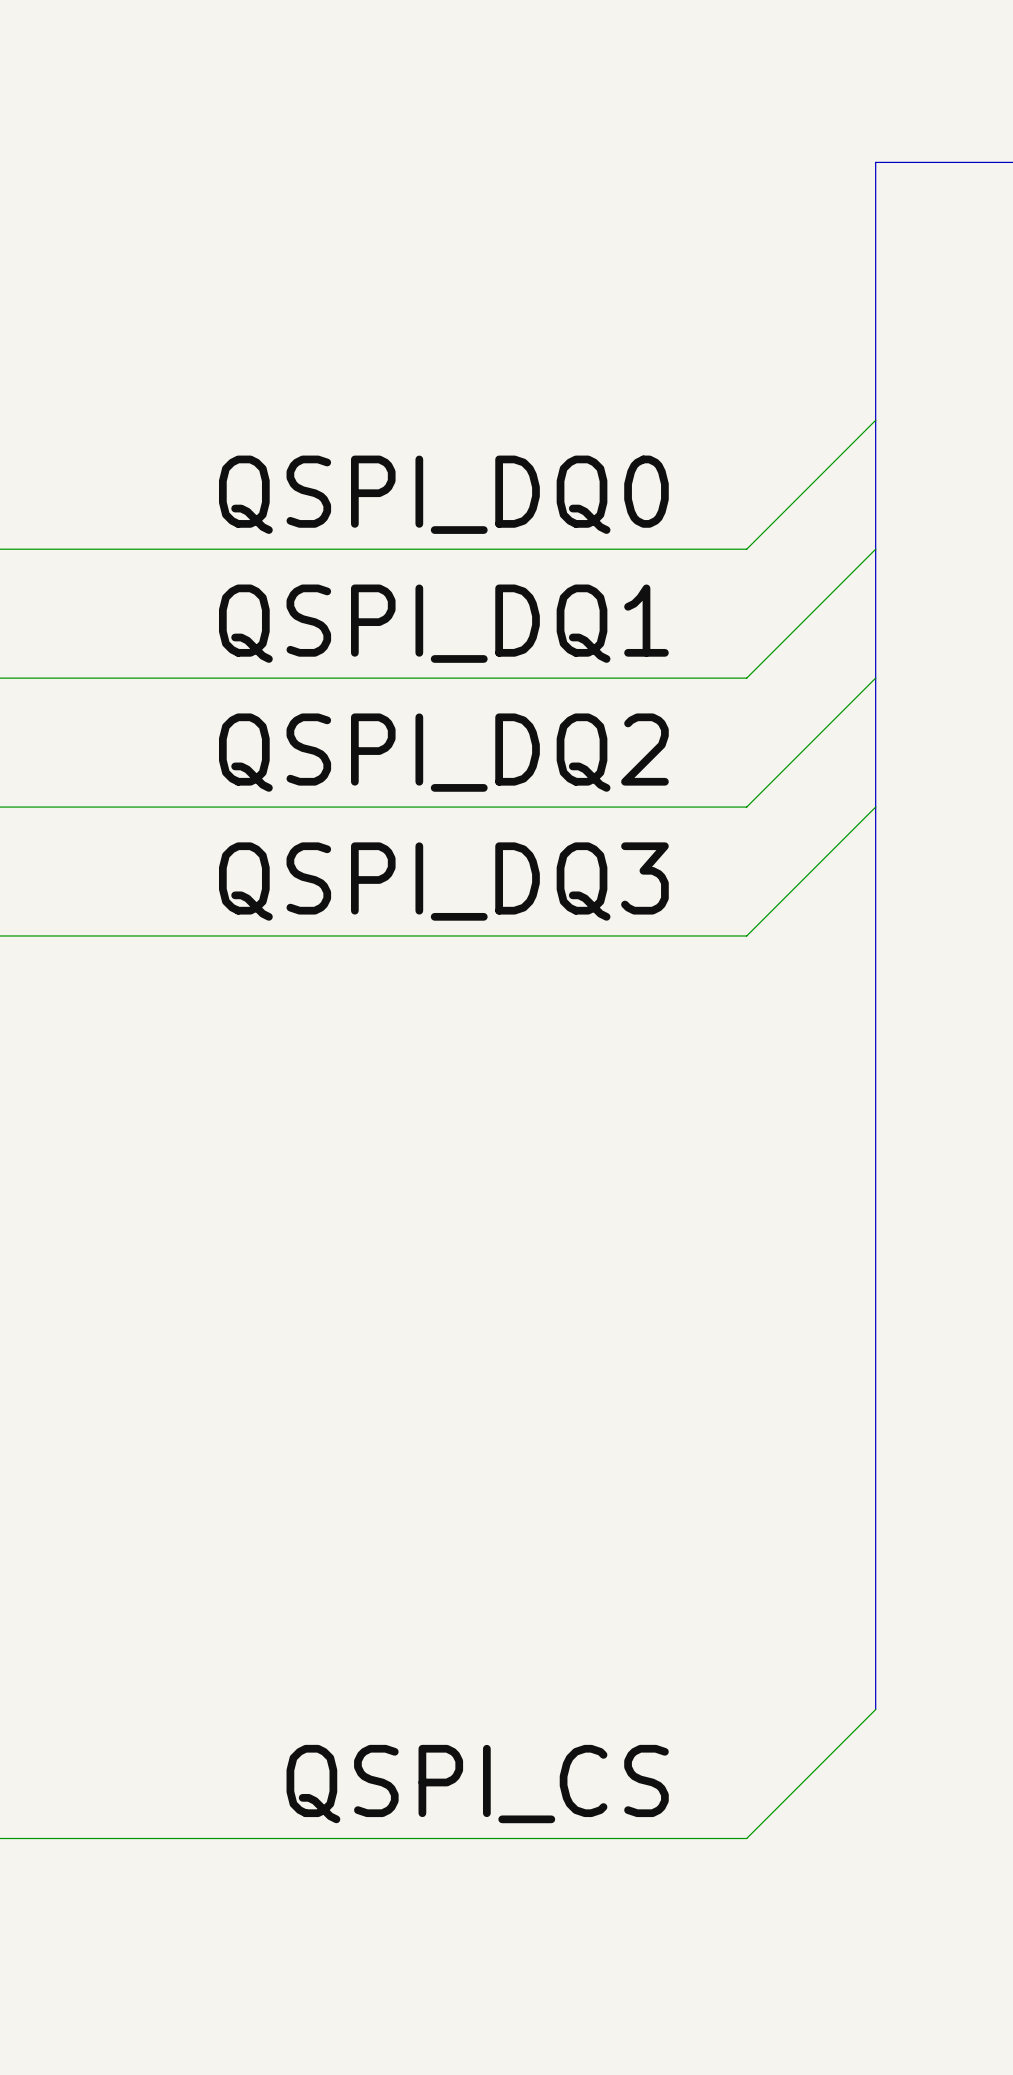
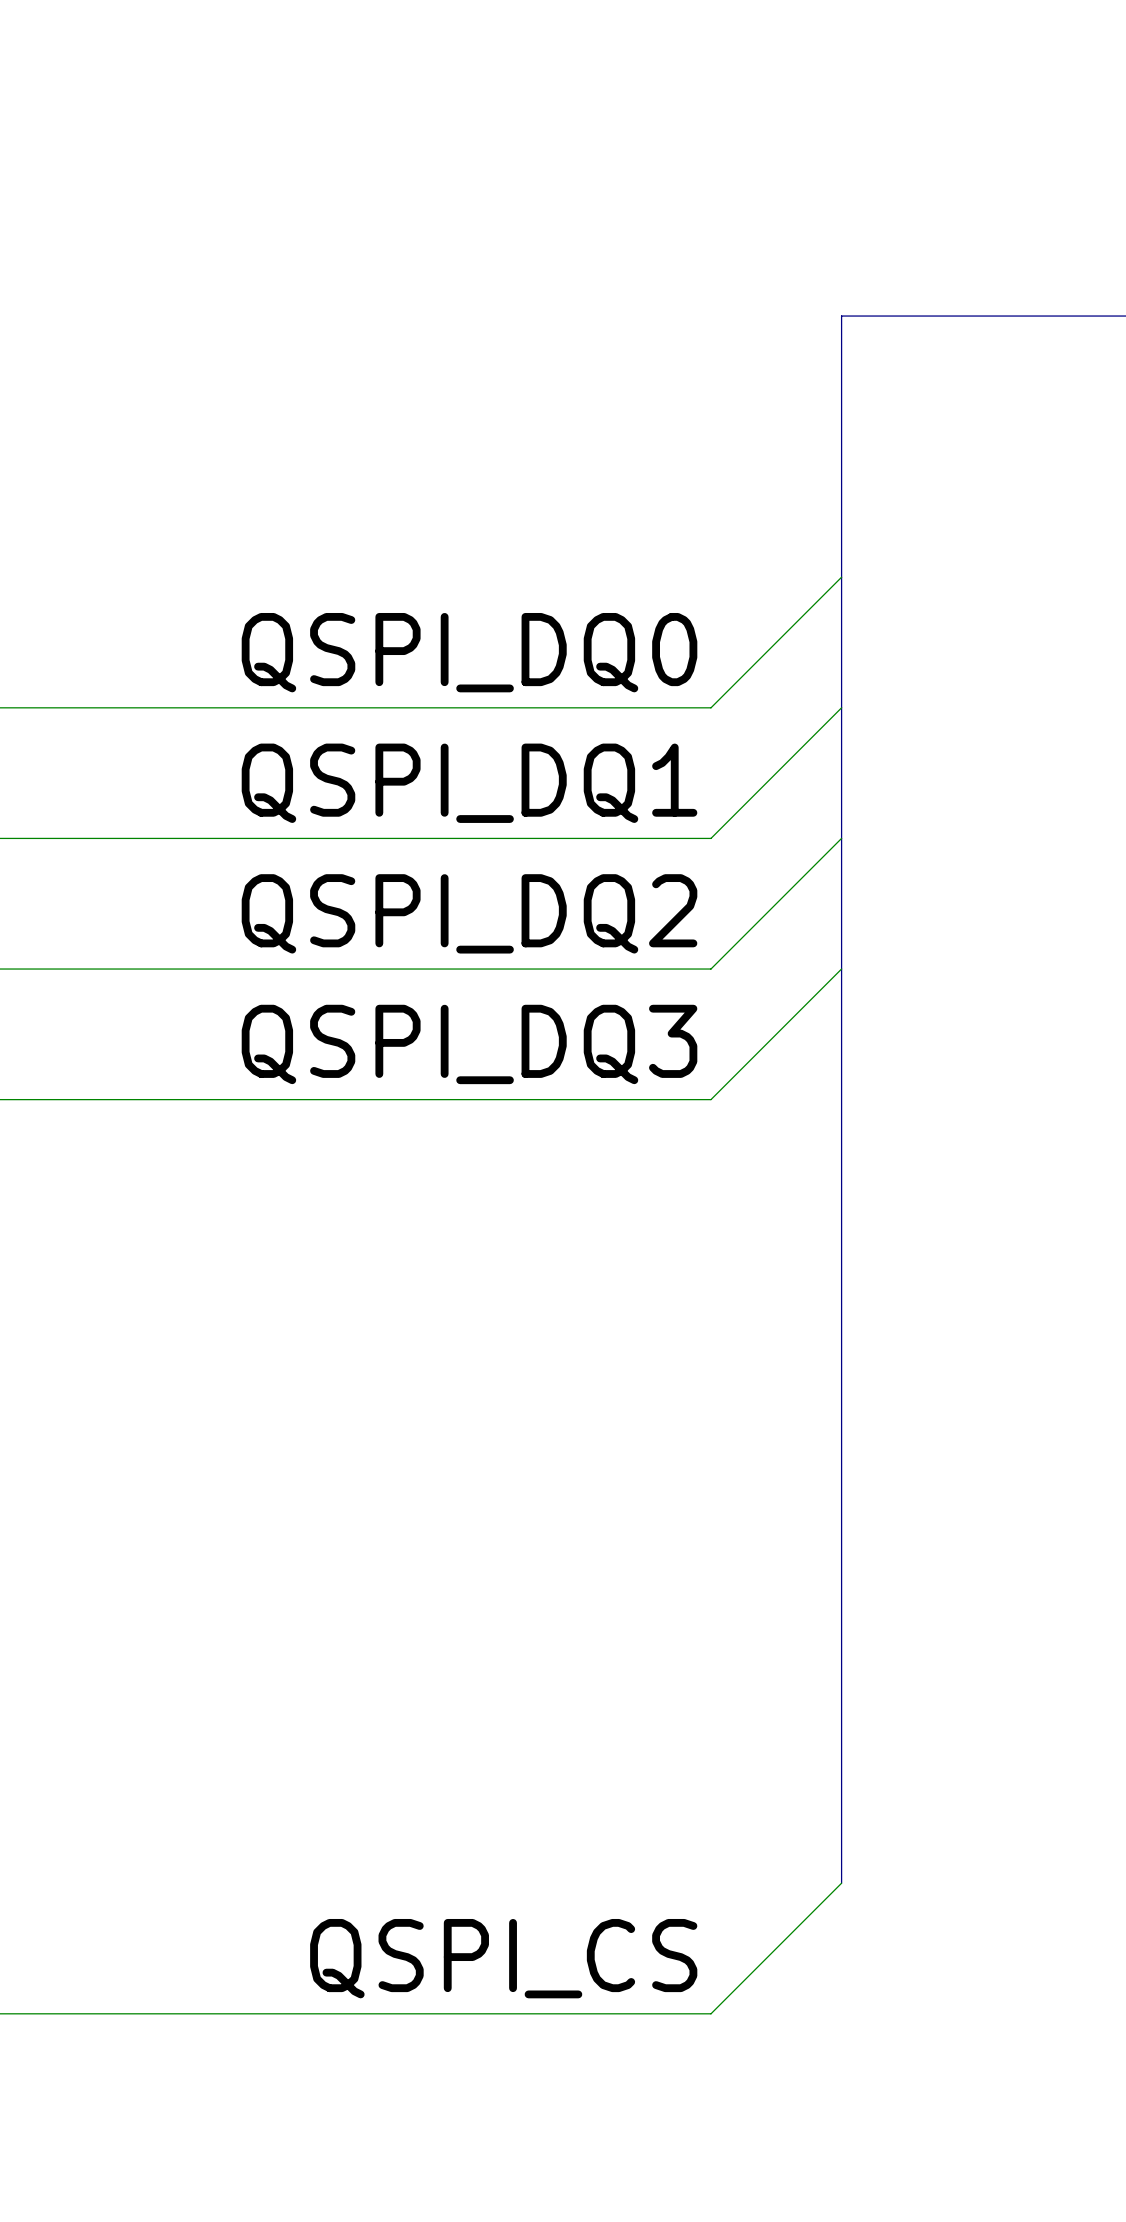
bus: (875, 162) (875, 1709) -> (906, 316) (841, 316) (841, 1883)
wire: (875, 420) (746, 549) (682, 549) -> (841, 577) (710, 707)
wire: (875, 549) (746, 678) (682, 678) -> (841, 707) (710, 838)
wire: (875, 678) (746, 807) (682, 807) -> (841, 838) (710, 969)
wire: (875, 807) (746, 935) (682, 935) -> (841, 969) (710, 1099)
wire: (875, 1709) (746, 1838) (682, 1838) -> (841, 1883) (710, 2013)

